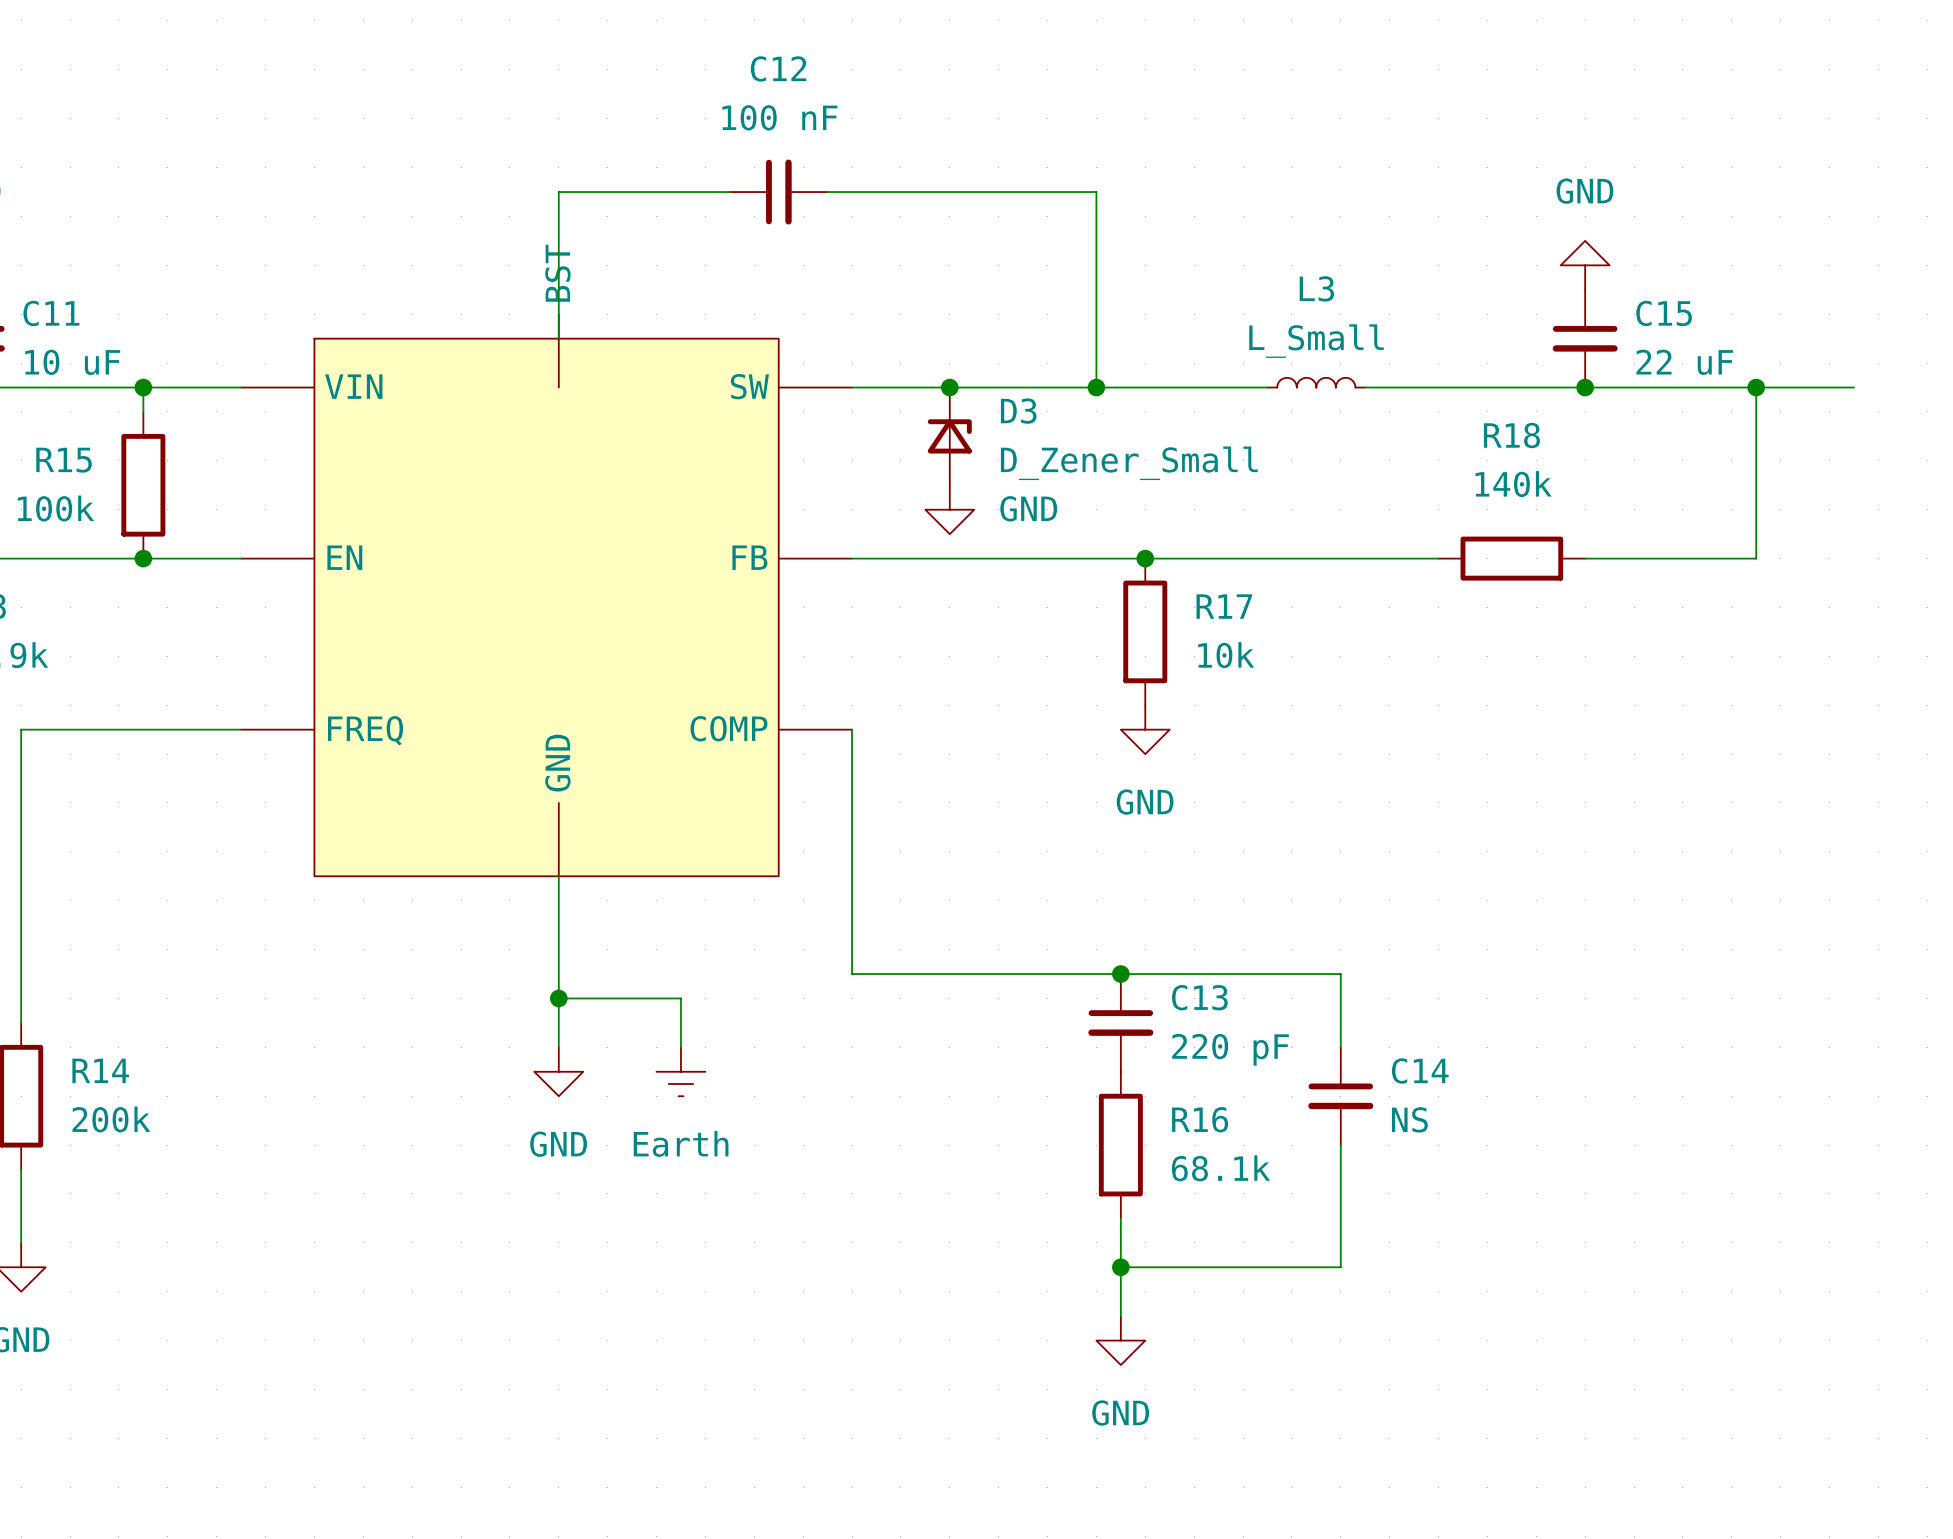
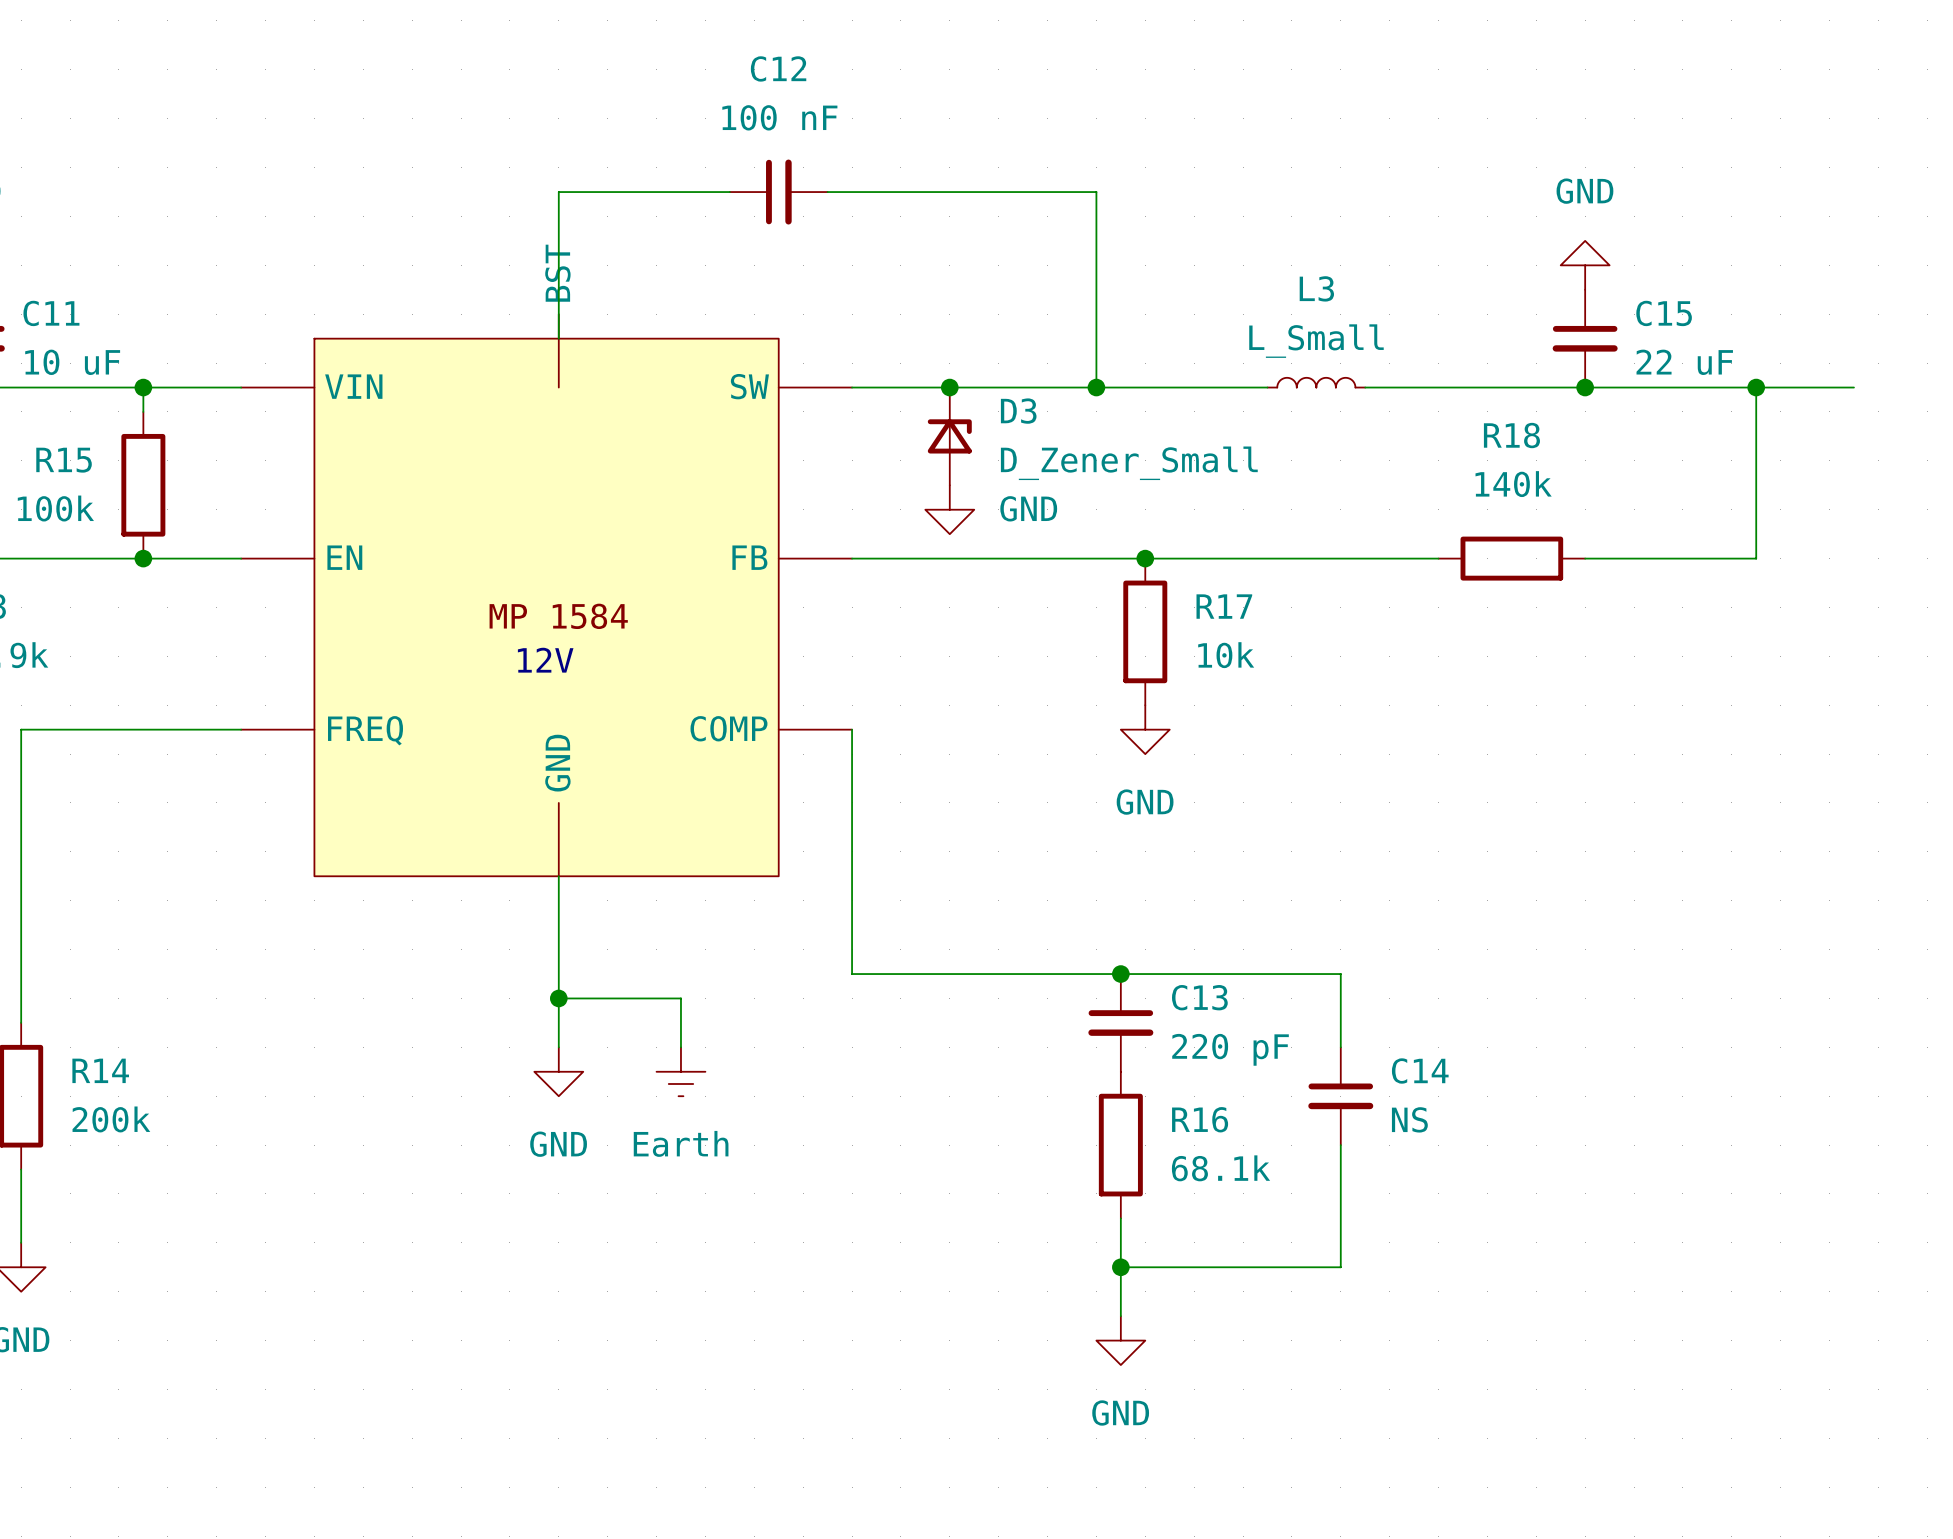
part text: none -> MP 1584 (558, 616)
text: none -> 12V (545, 660)

